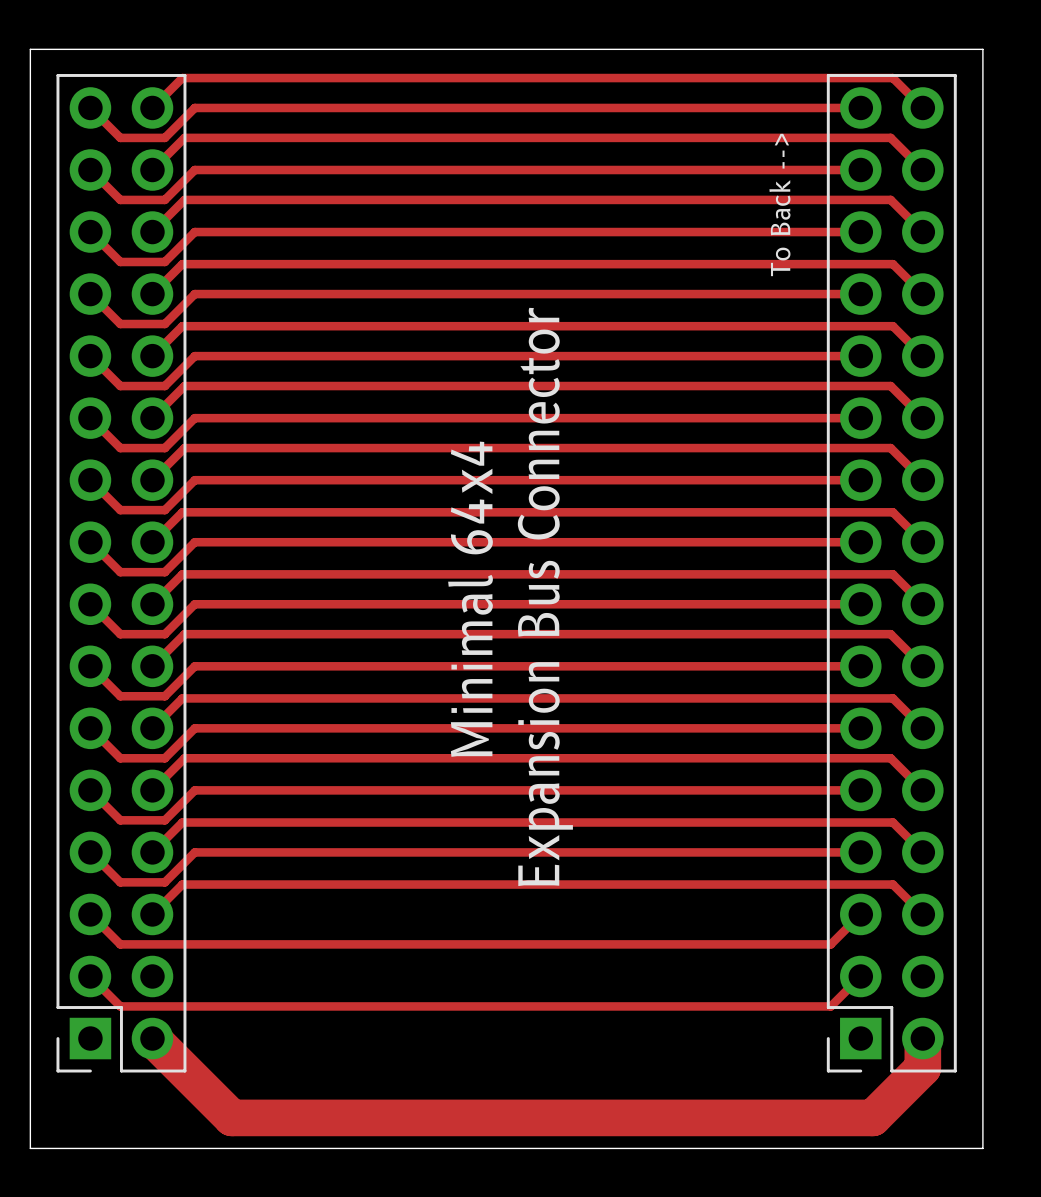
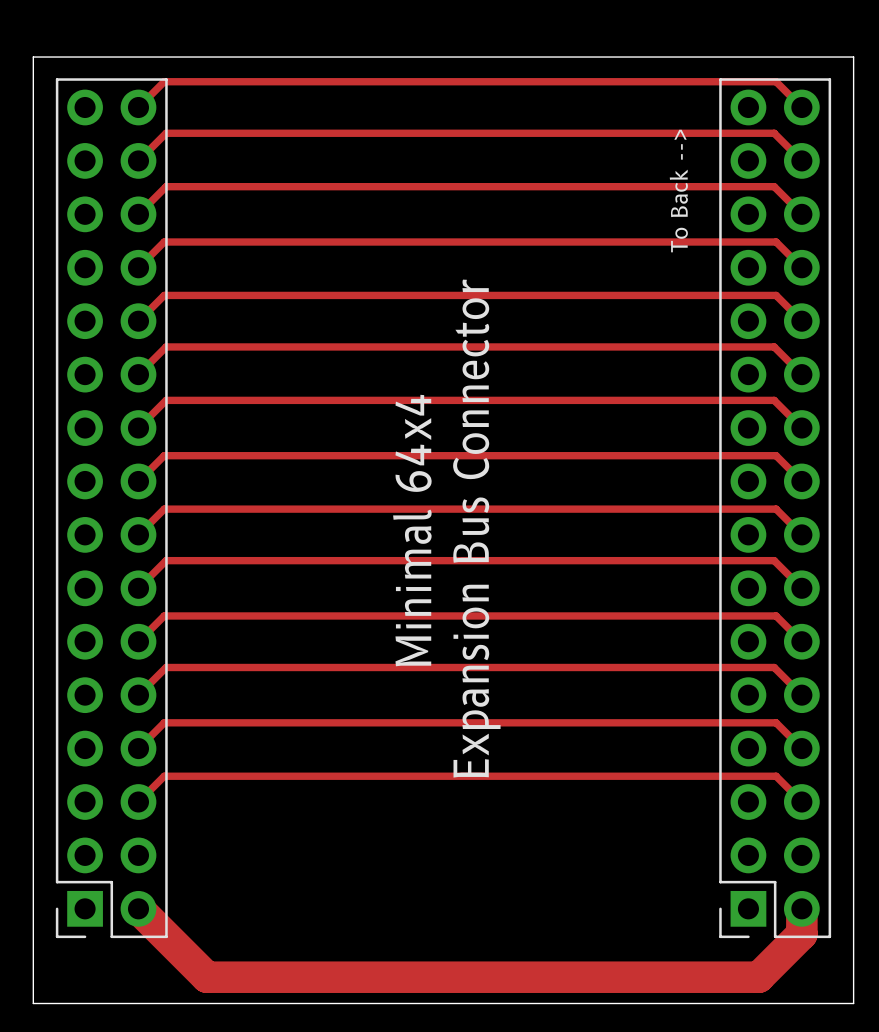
track: (90, 107) (120, 137) (164, 137) (194, 107) (860, 107) -> none
track: (90, 170) (120, 199) (164, 199) (194, 170) (860, 170) -> none
track: (90, 232) (120, 261) (164, 261) (194, 232) (860, 232) -> none
track: (90, 294) (120, 324) (164, 324) (194, 294) (860, 294) -> none
track: (90, 356) (120, 386) (164, 386) (194, 356) (860, 356) -> none
track: (90, 418) (120, 448) (164, 448) (194, 418) (860, 418) -> none
track: (90, 480) (120, 510) (164, 510) (194, 480) (860, 480) -> none
track: (90, 542) (120, 572) (164, 572) (194, 542) (860, 542) -> none
track: (90, 604) (120, 634) (164, 634) (194, 604) (860, 604) -> none
track: (90, 666) (120, 696) (164, 696) (194, 666) (860, 666) -> none
track: (90, 728) (120, 758) (164, 758) (194, 728) (860, 728) -> none
track: (90, 790) (120, 820) (164, 820) (194, 790) (860, 790) -> none
track: (90, 852) (120, 882) (164, 882) (194, 852) (860, 852) -> none
track: (90, 914) (120, 944) (830, 944) (860, 914) -> none
track: (90, 976) (120, 1006) (830, 1006) (860, 976) -> none

